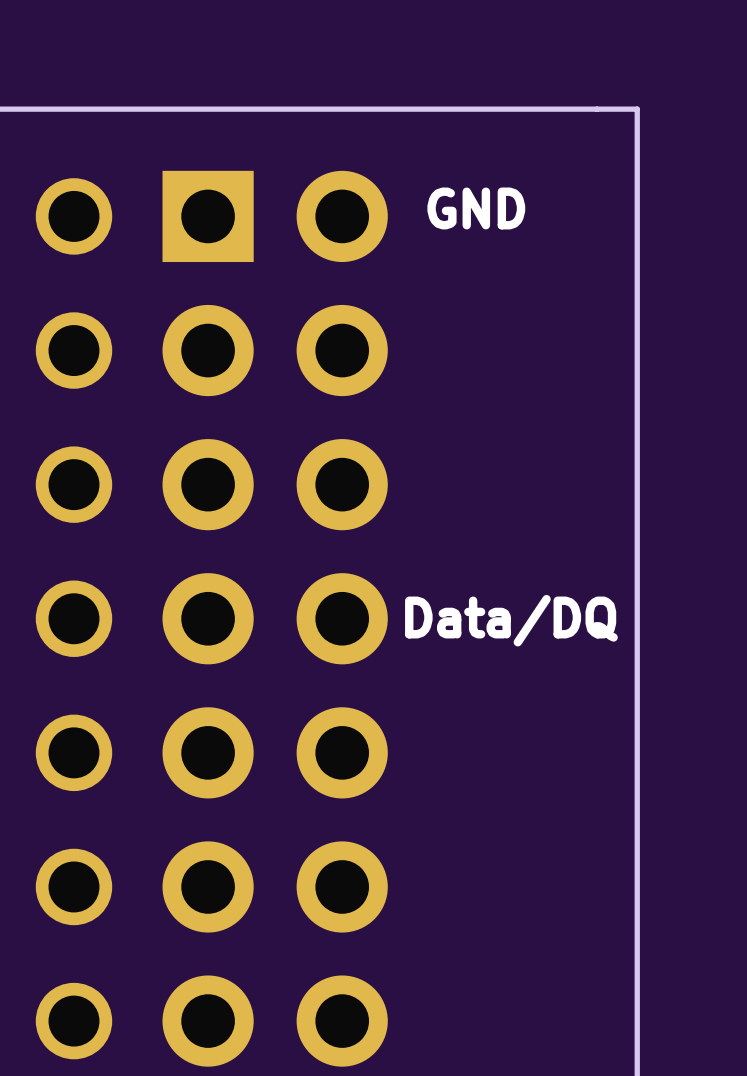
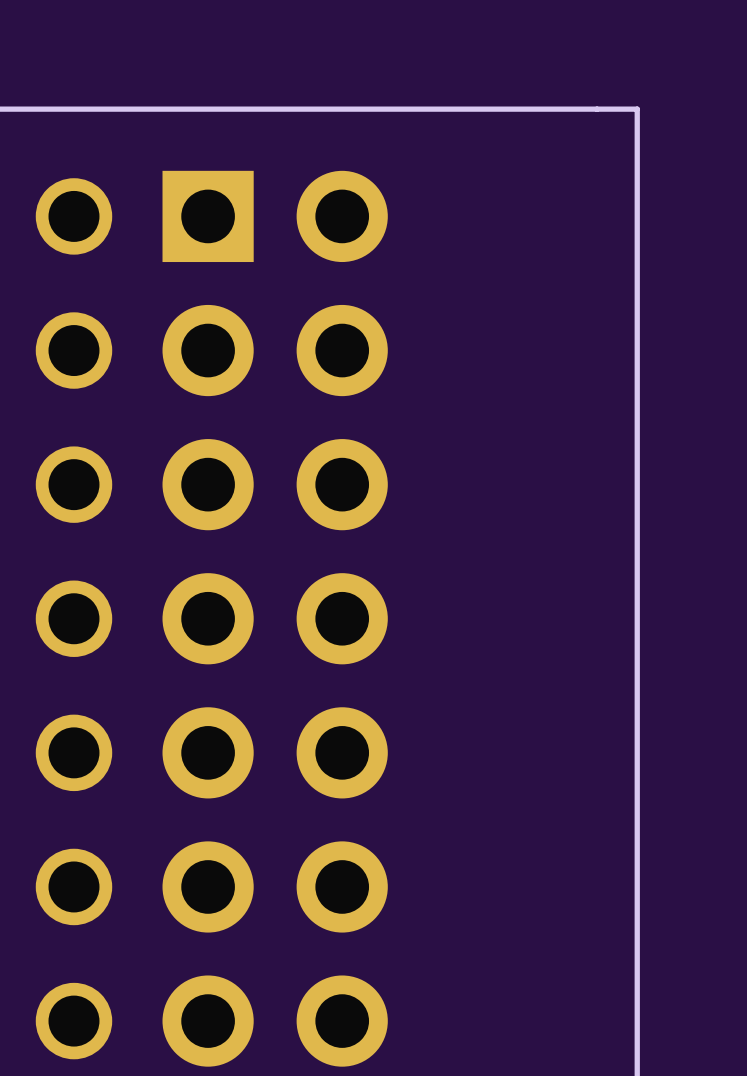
text: GND (476, 208) -> none
text: Data/DQ (511, 620) -> none

